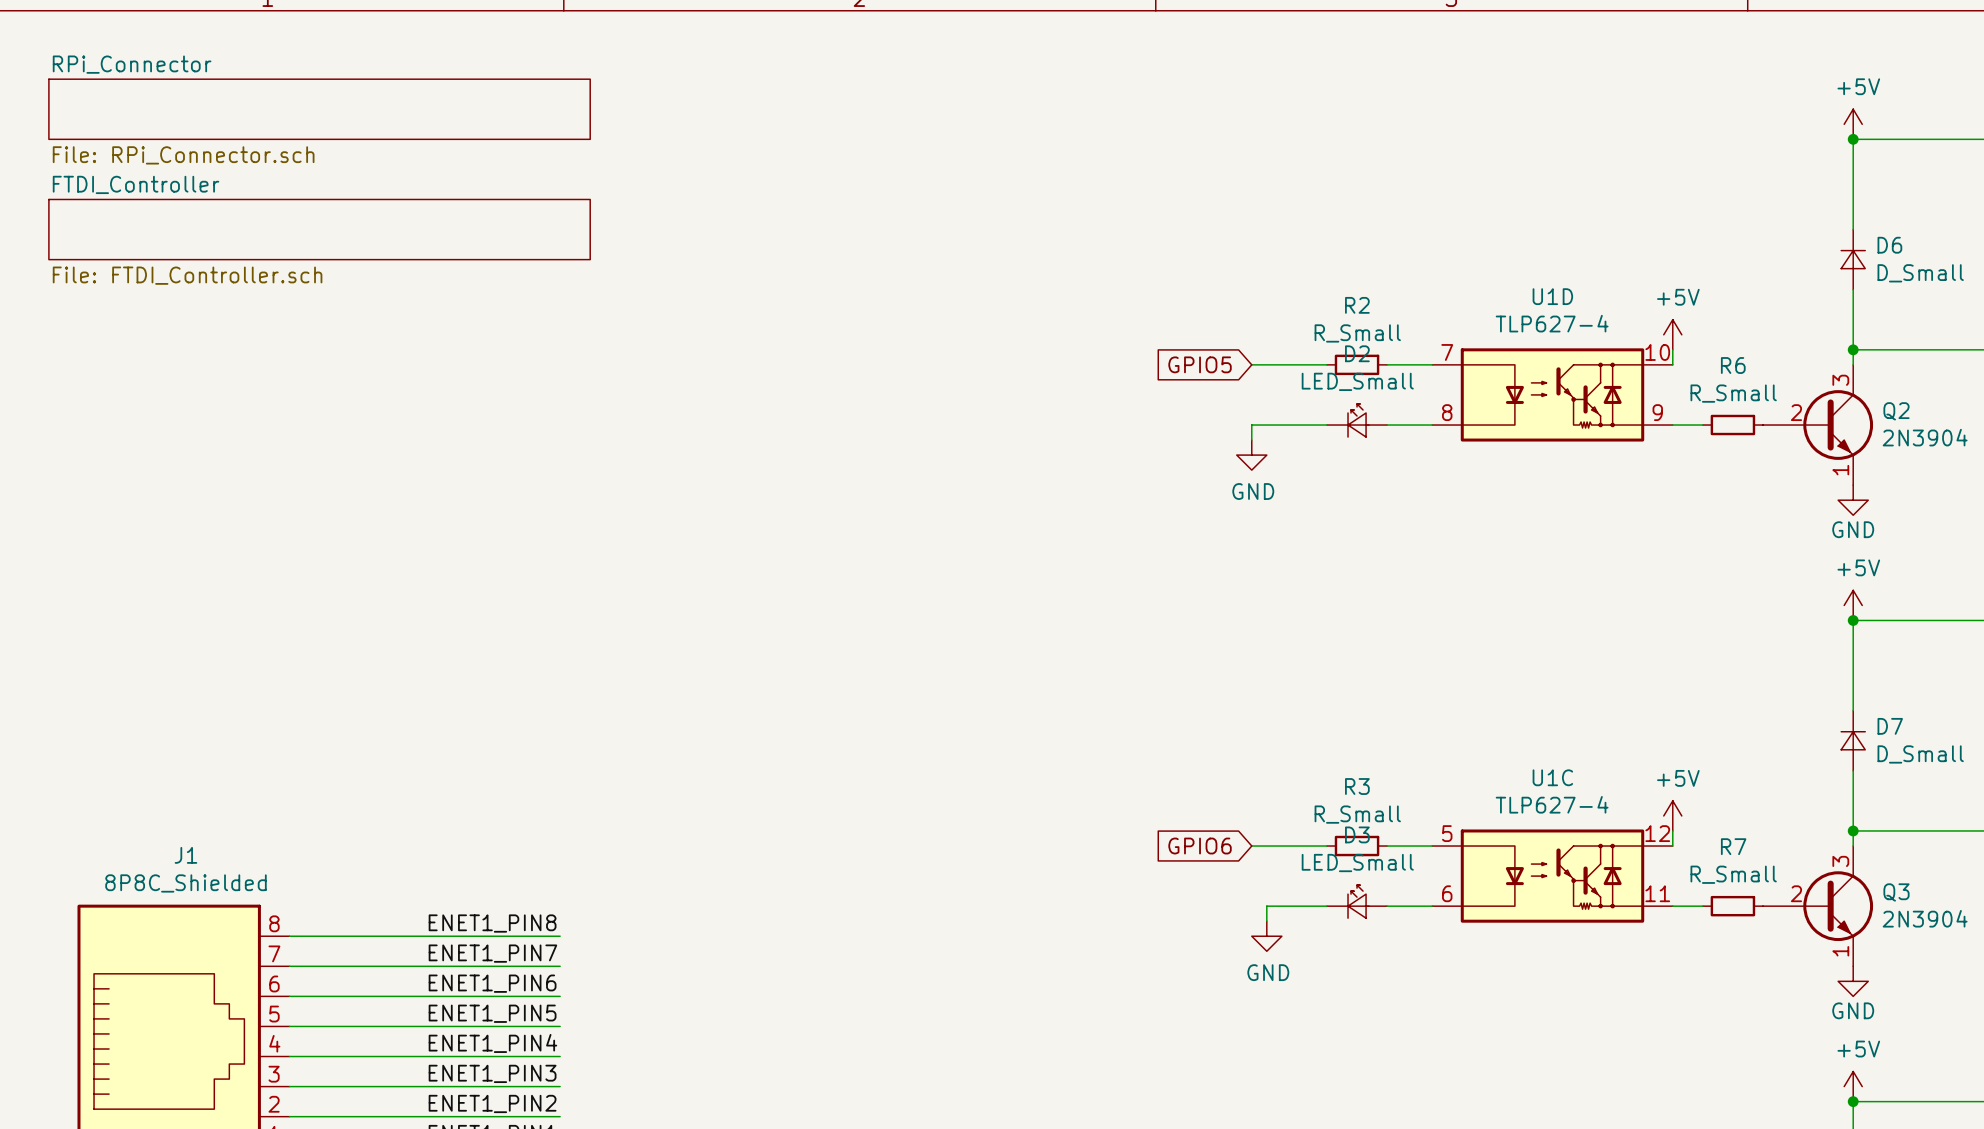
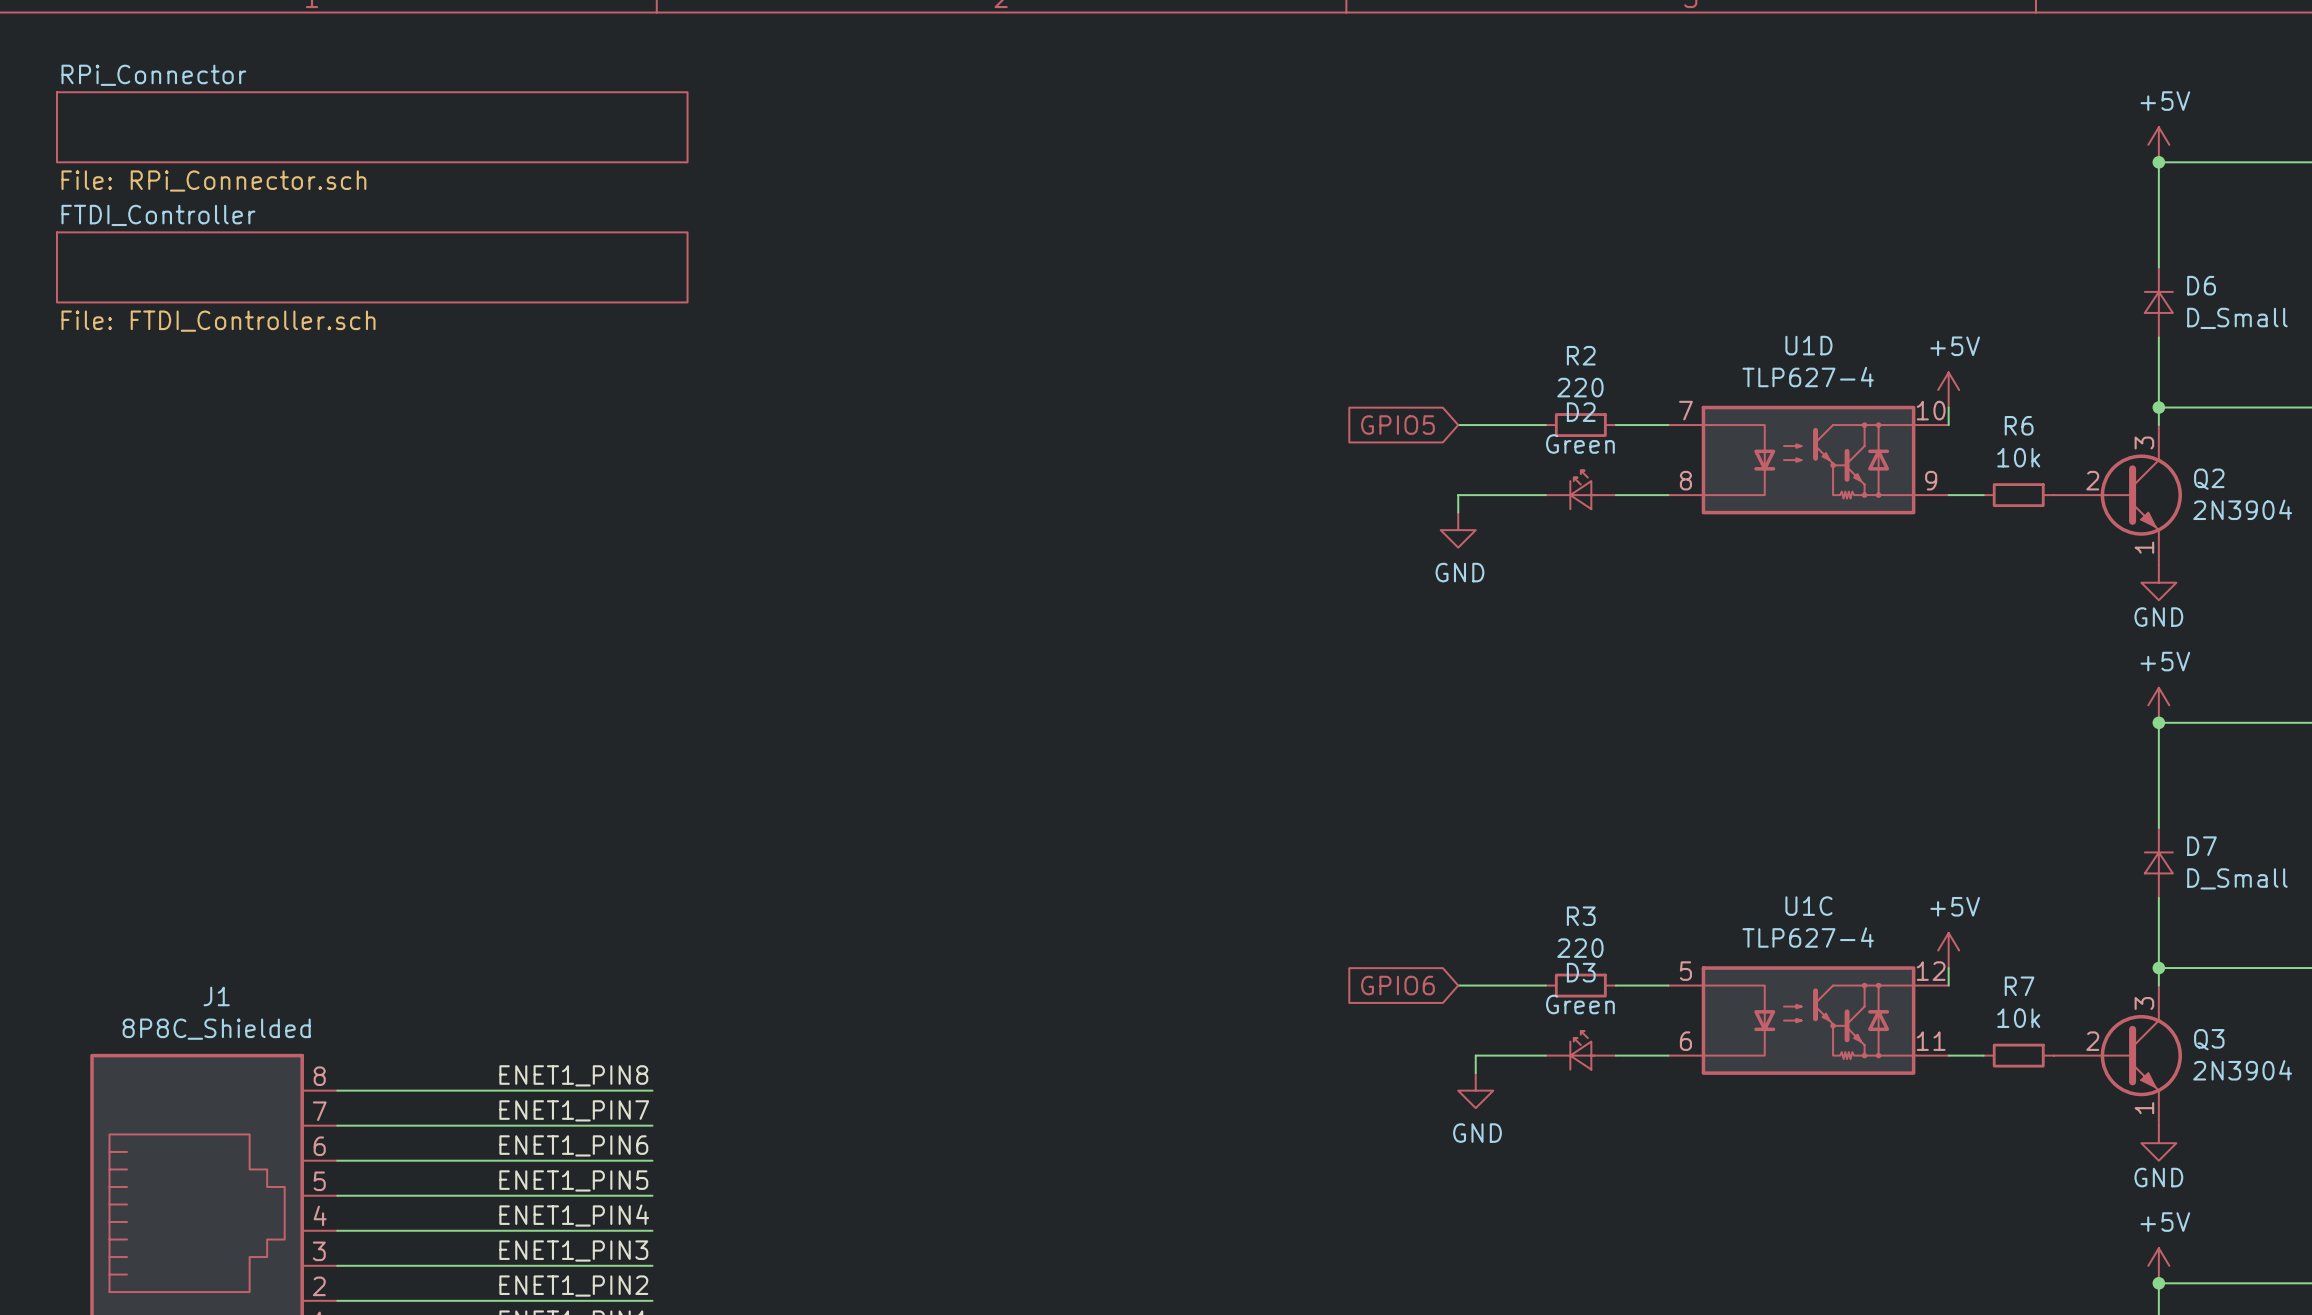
R2 value: R_Small (1357, 333) -> 220 (1580, 387)
D2 value: LED_Small (1357, 381) -> Green (1580, 444)
R6 value: R_Small (1733, 393) -> 10k (2018, 457)
R3 value: R_Small (1357, 814) -> 220 (1580, 948)
D3 value: LED_Small (1357, 863) -> Green (1580, 1004)
R7 value: R_Small (1733, 874) -> 10k (2018, 1018)

